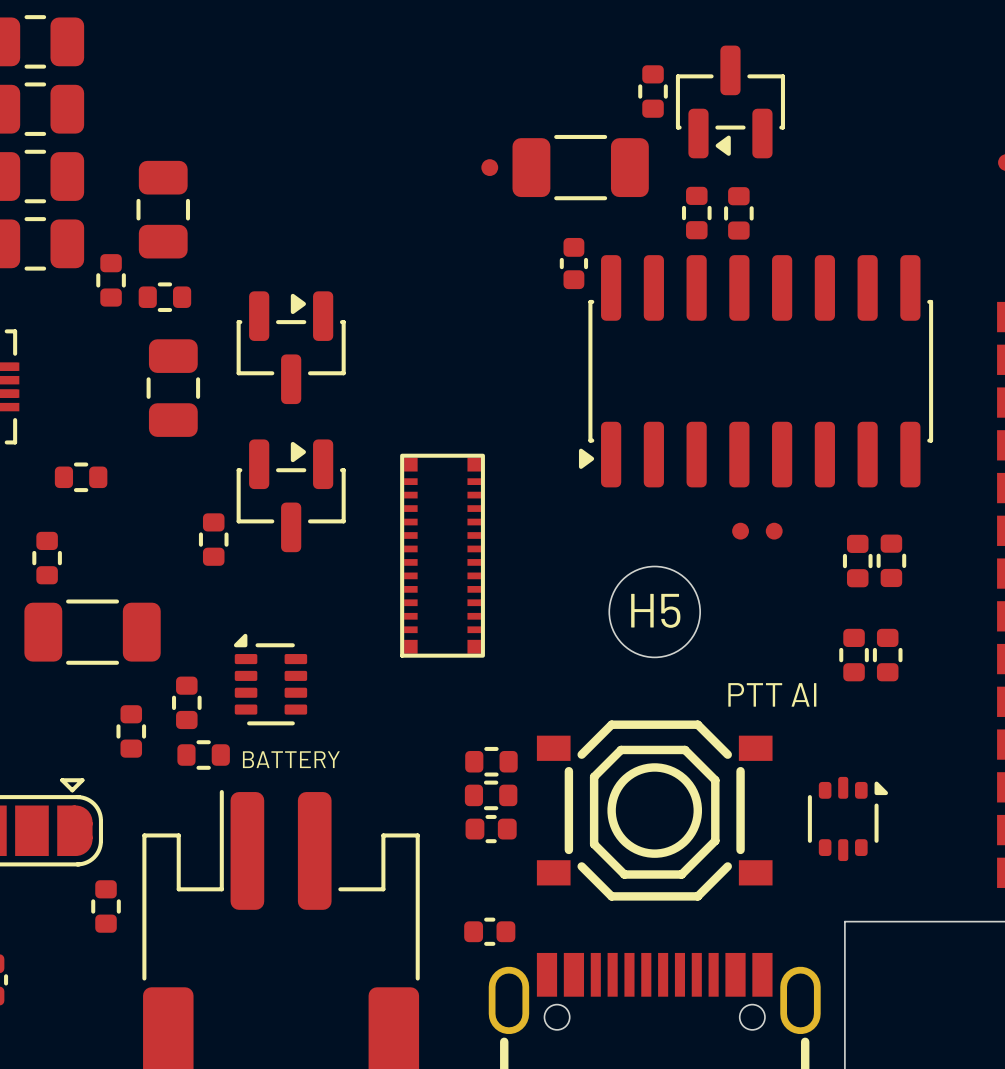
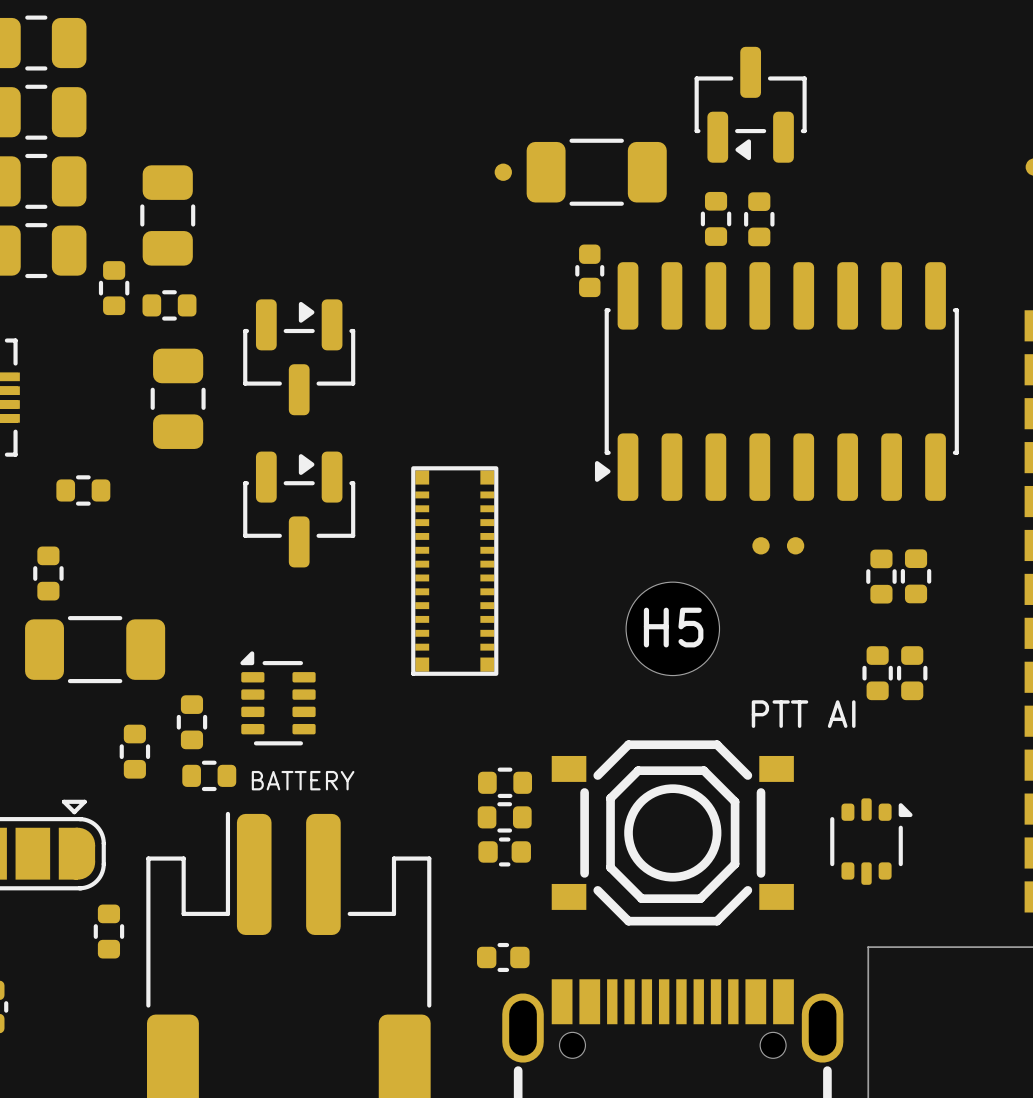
part: (653, 91) -> none
part: (213, 539) -> none

